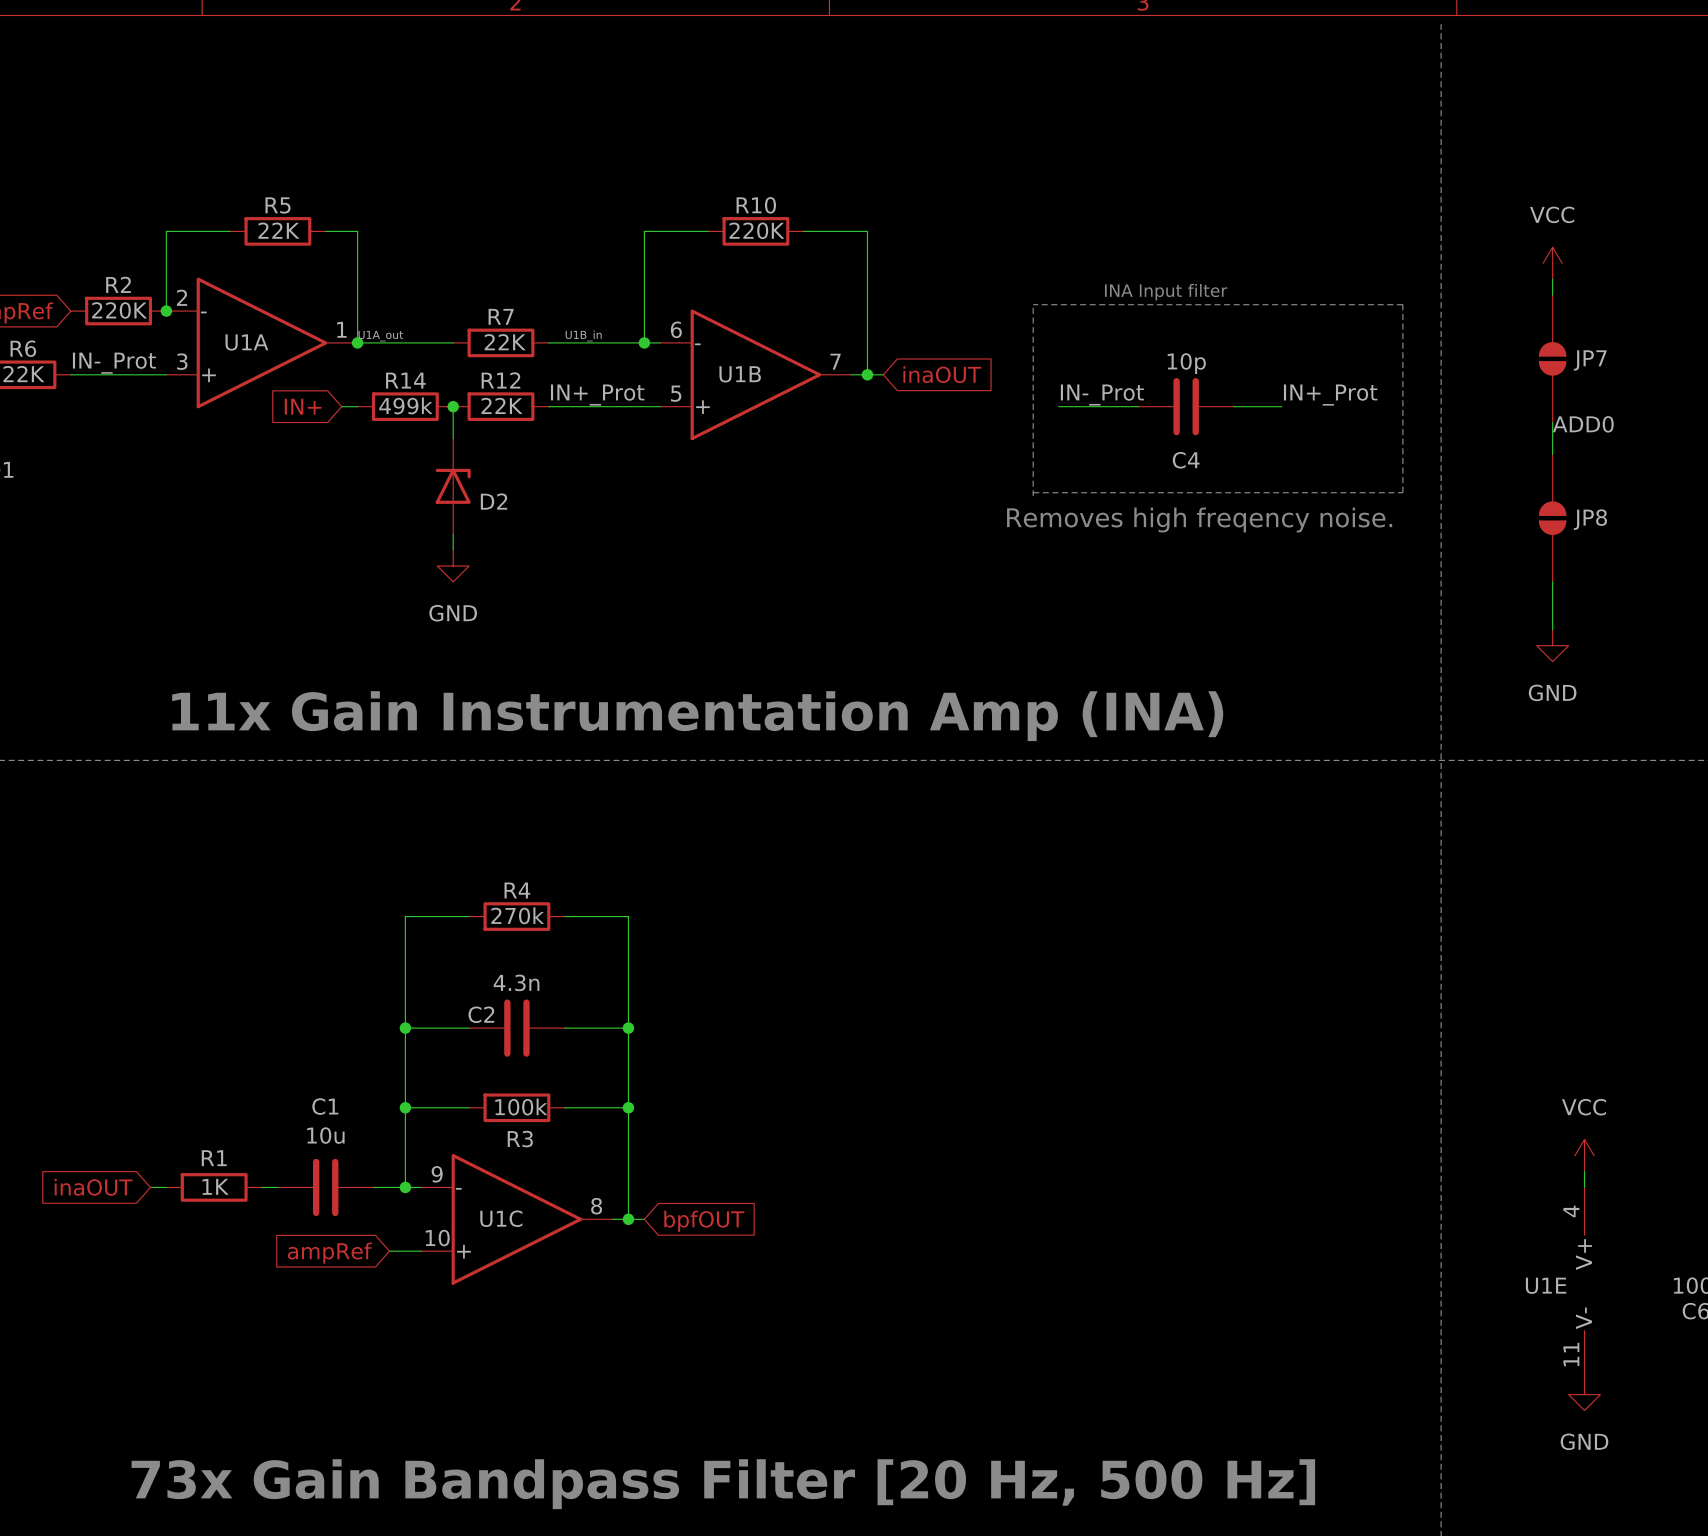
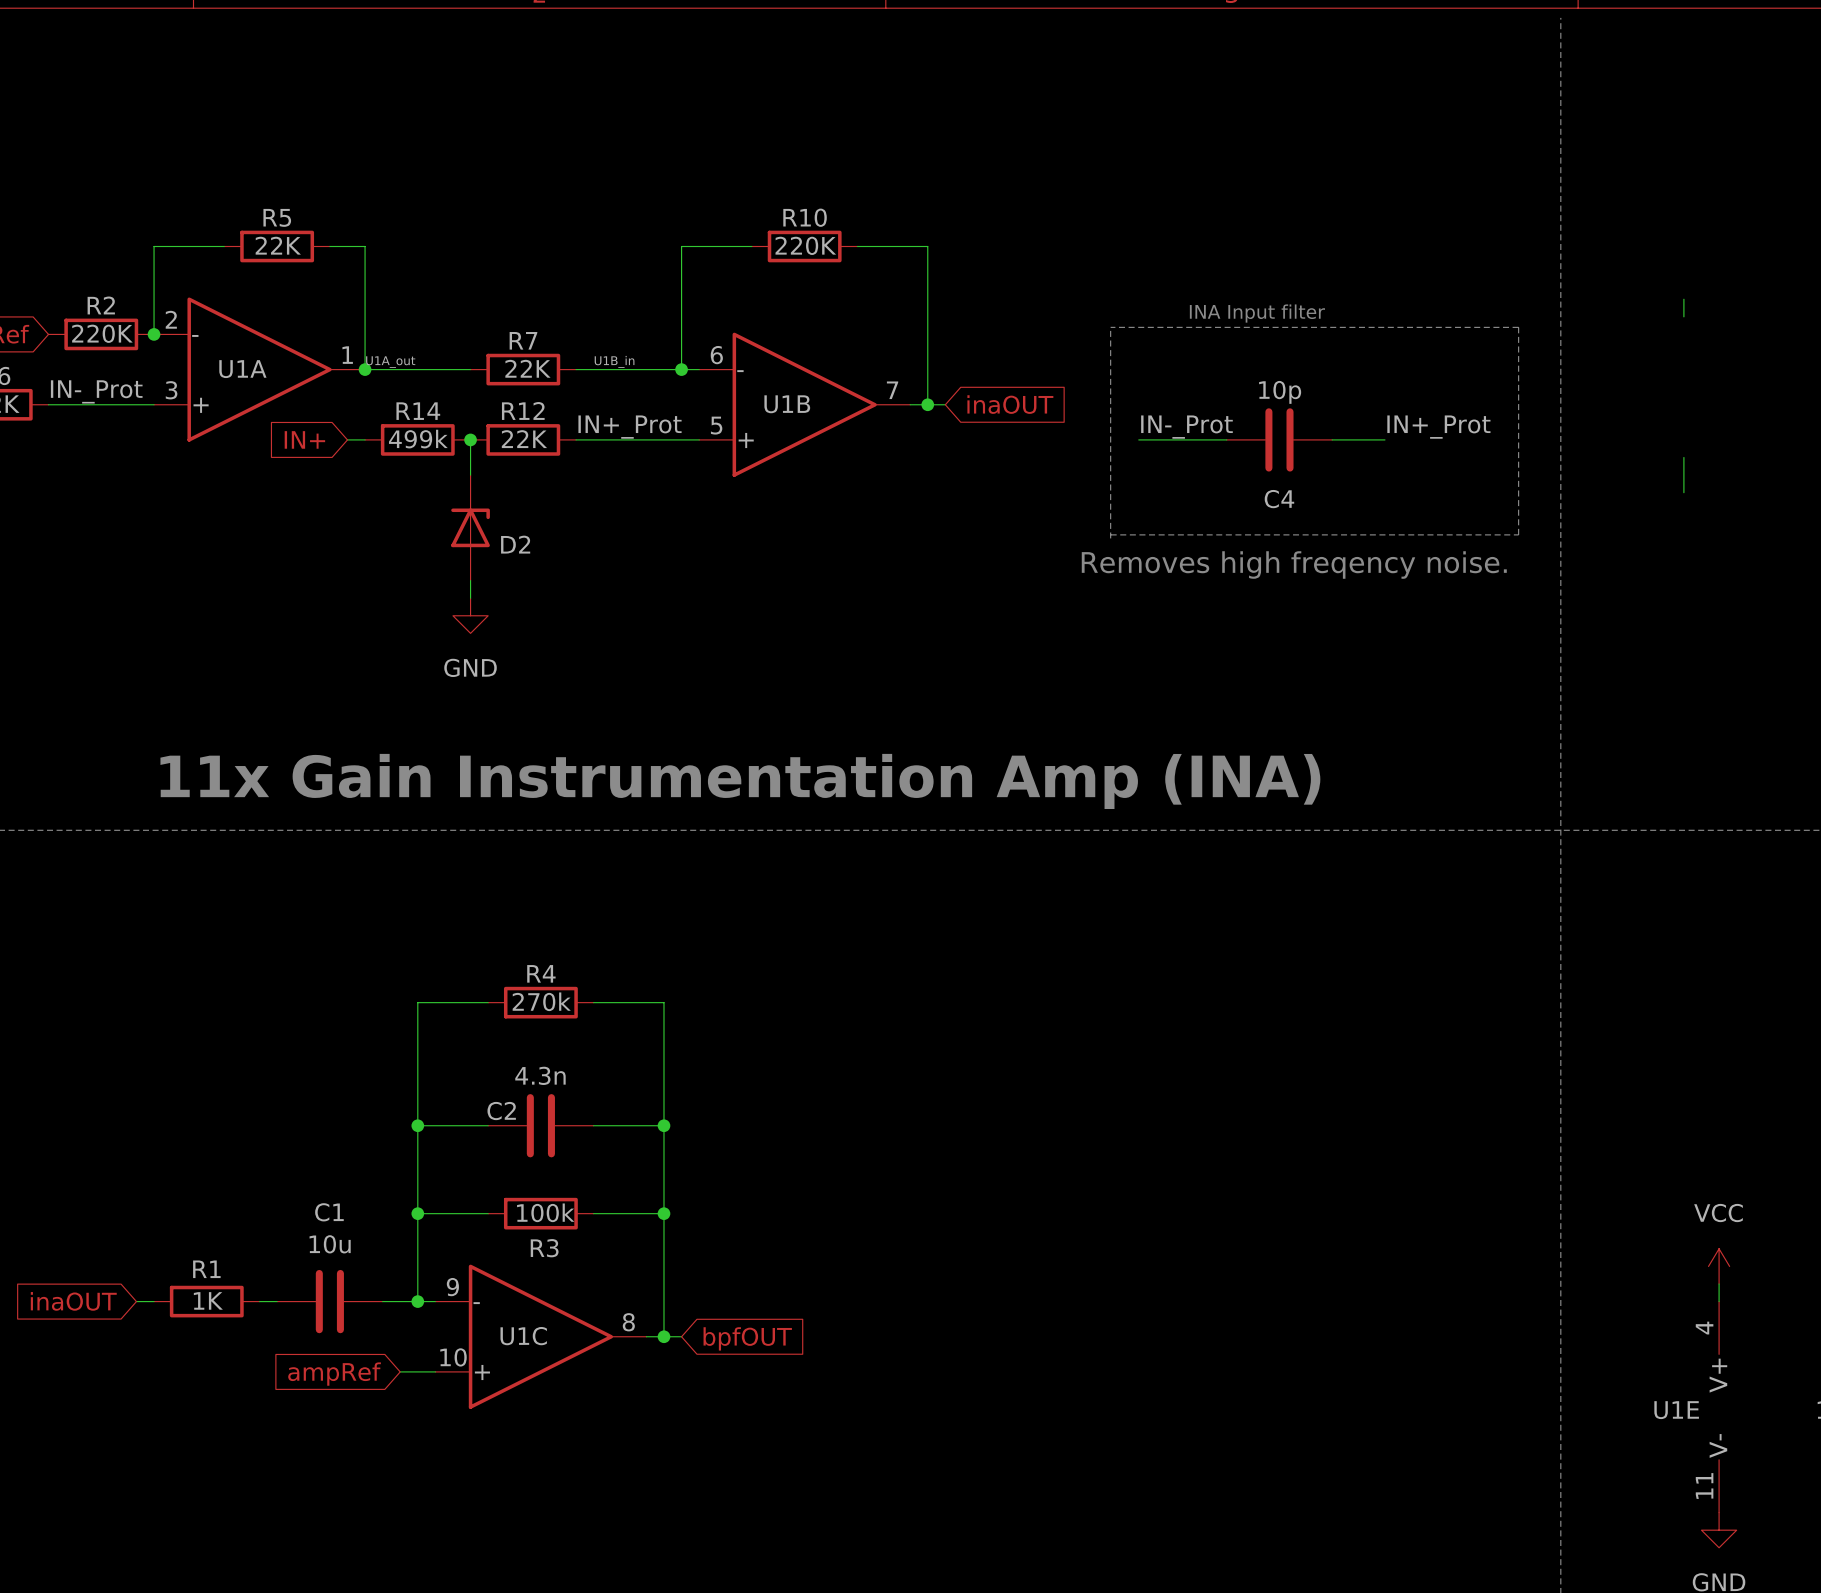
power symbol: VCC (1552, 263) -> none
JP7: (1552, 358) -> none
label: ADD0 (1583, 424) -> none
JP8: (1552, 518) -> none
wire: (1552, 581) (1552, 629) -> none
power symbol: GND (1552, 645) -> none

